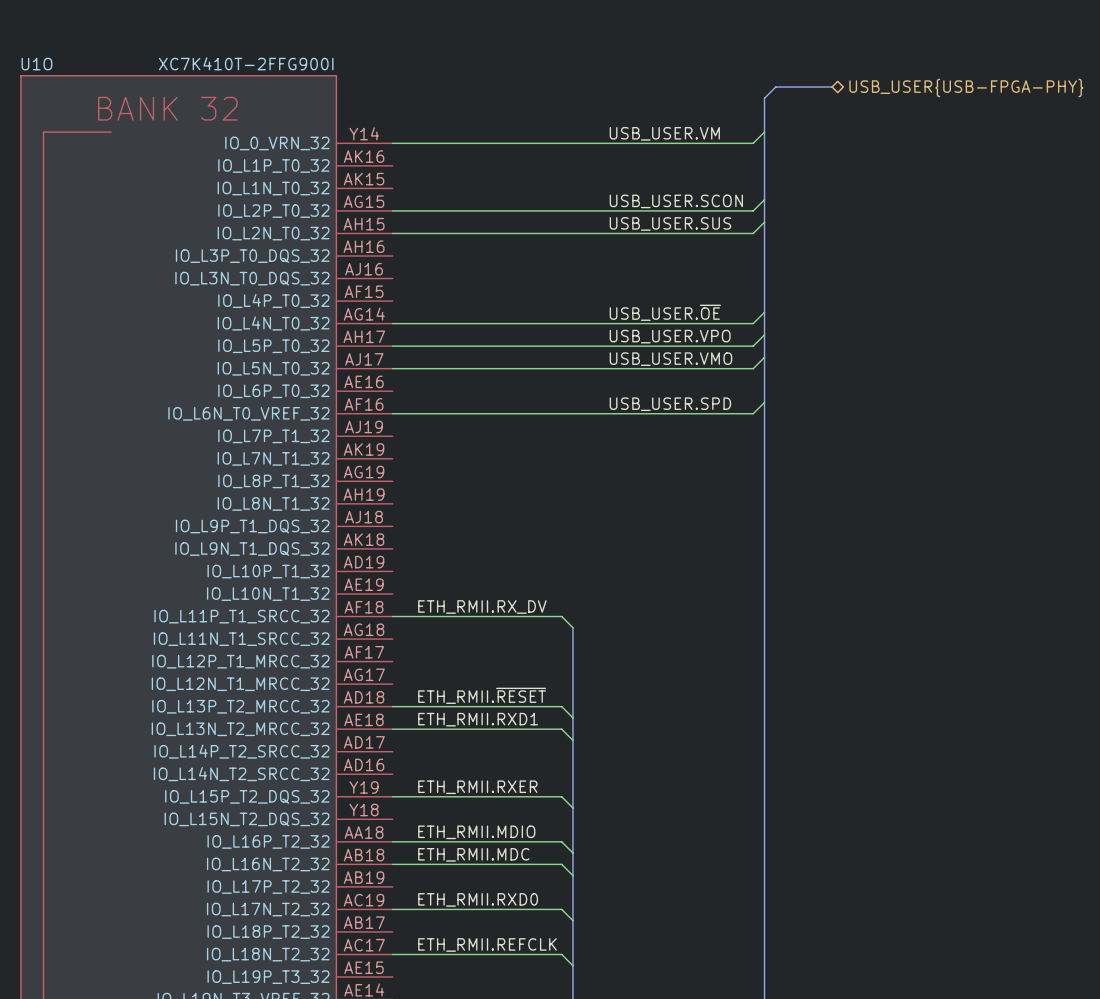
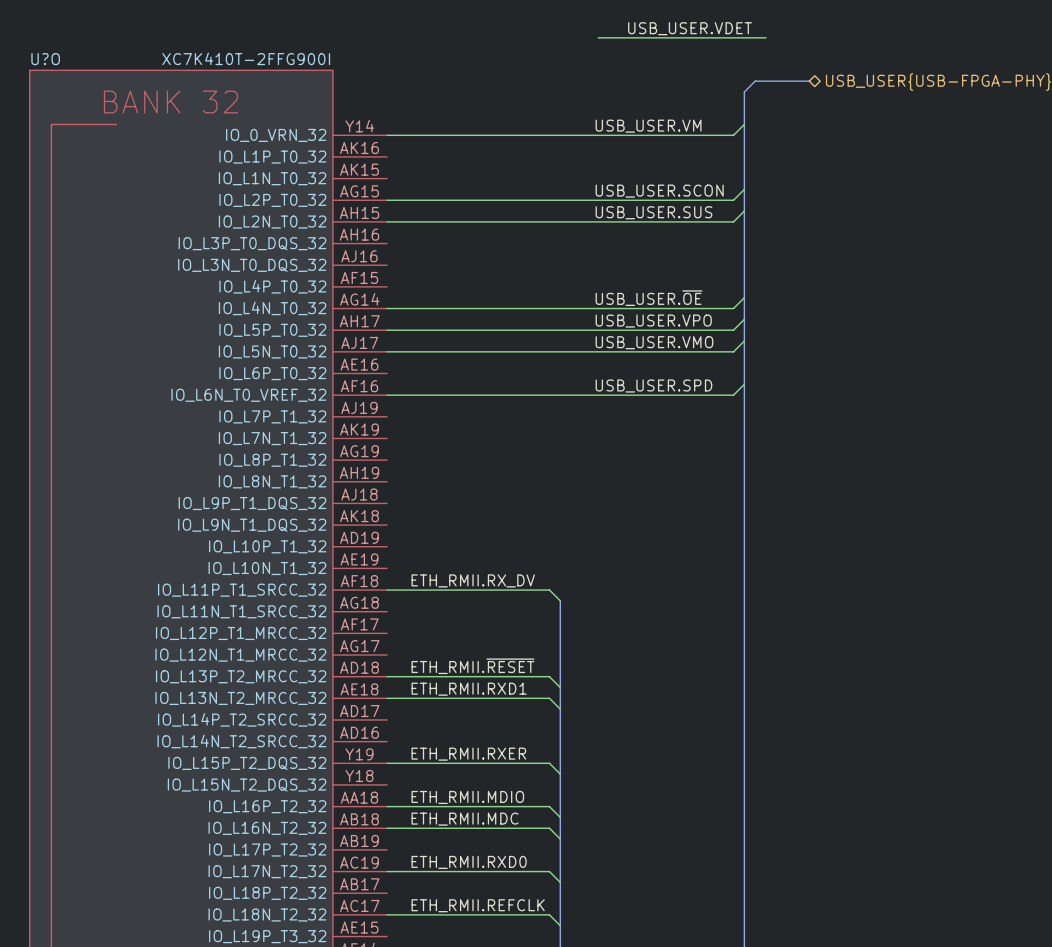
label: none -> USB_USER.VDET (690, 28)
wire: none -> (598, 37) (766, 37)
U1O name: U1O (36, 64) -> U?O (45, 59)

